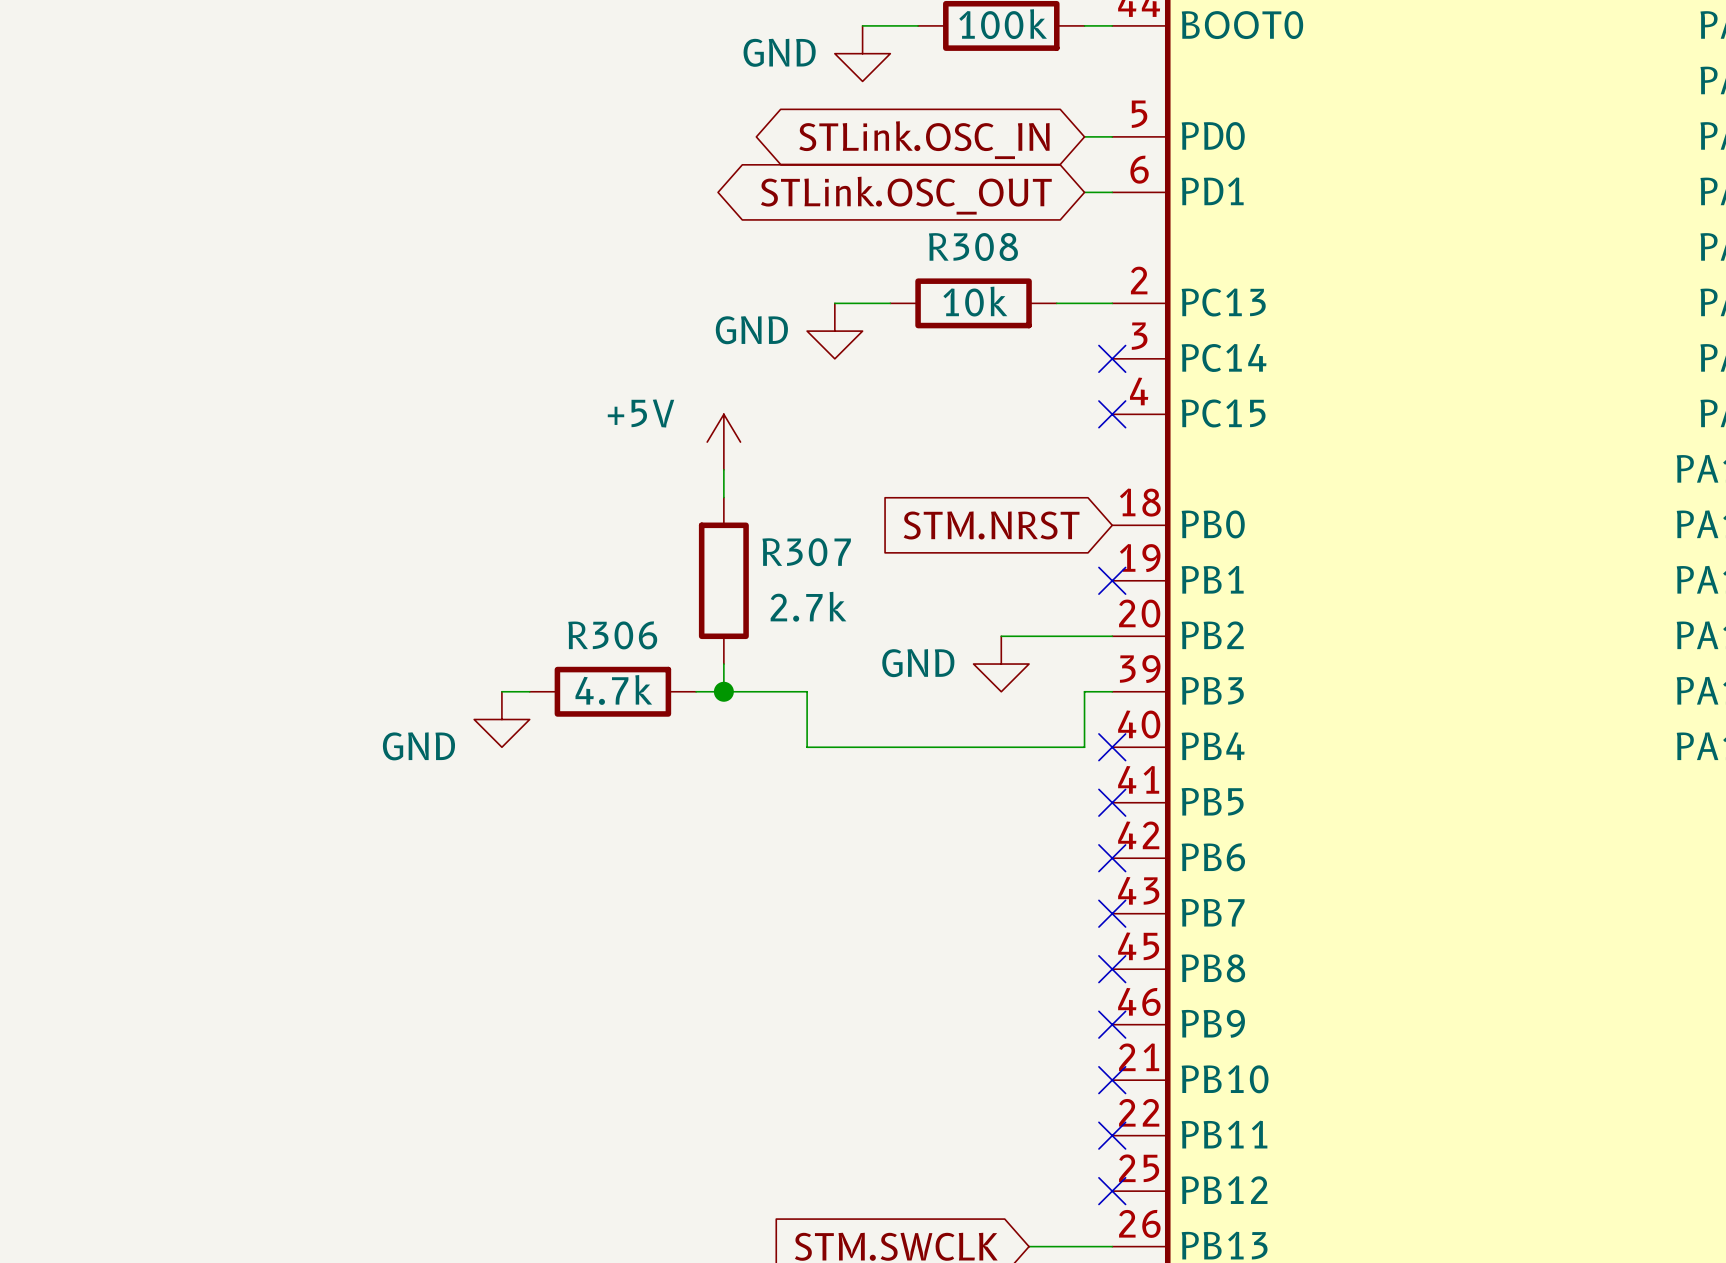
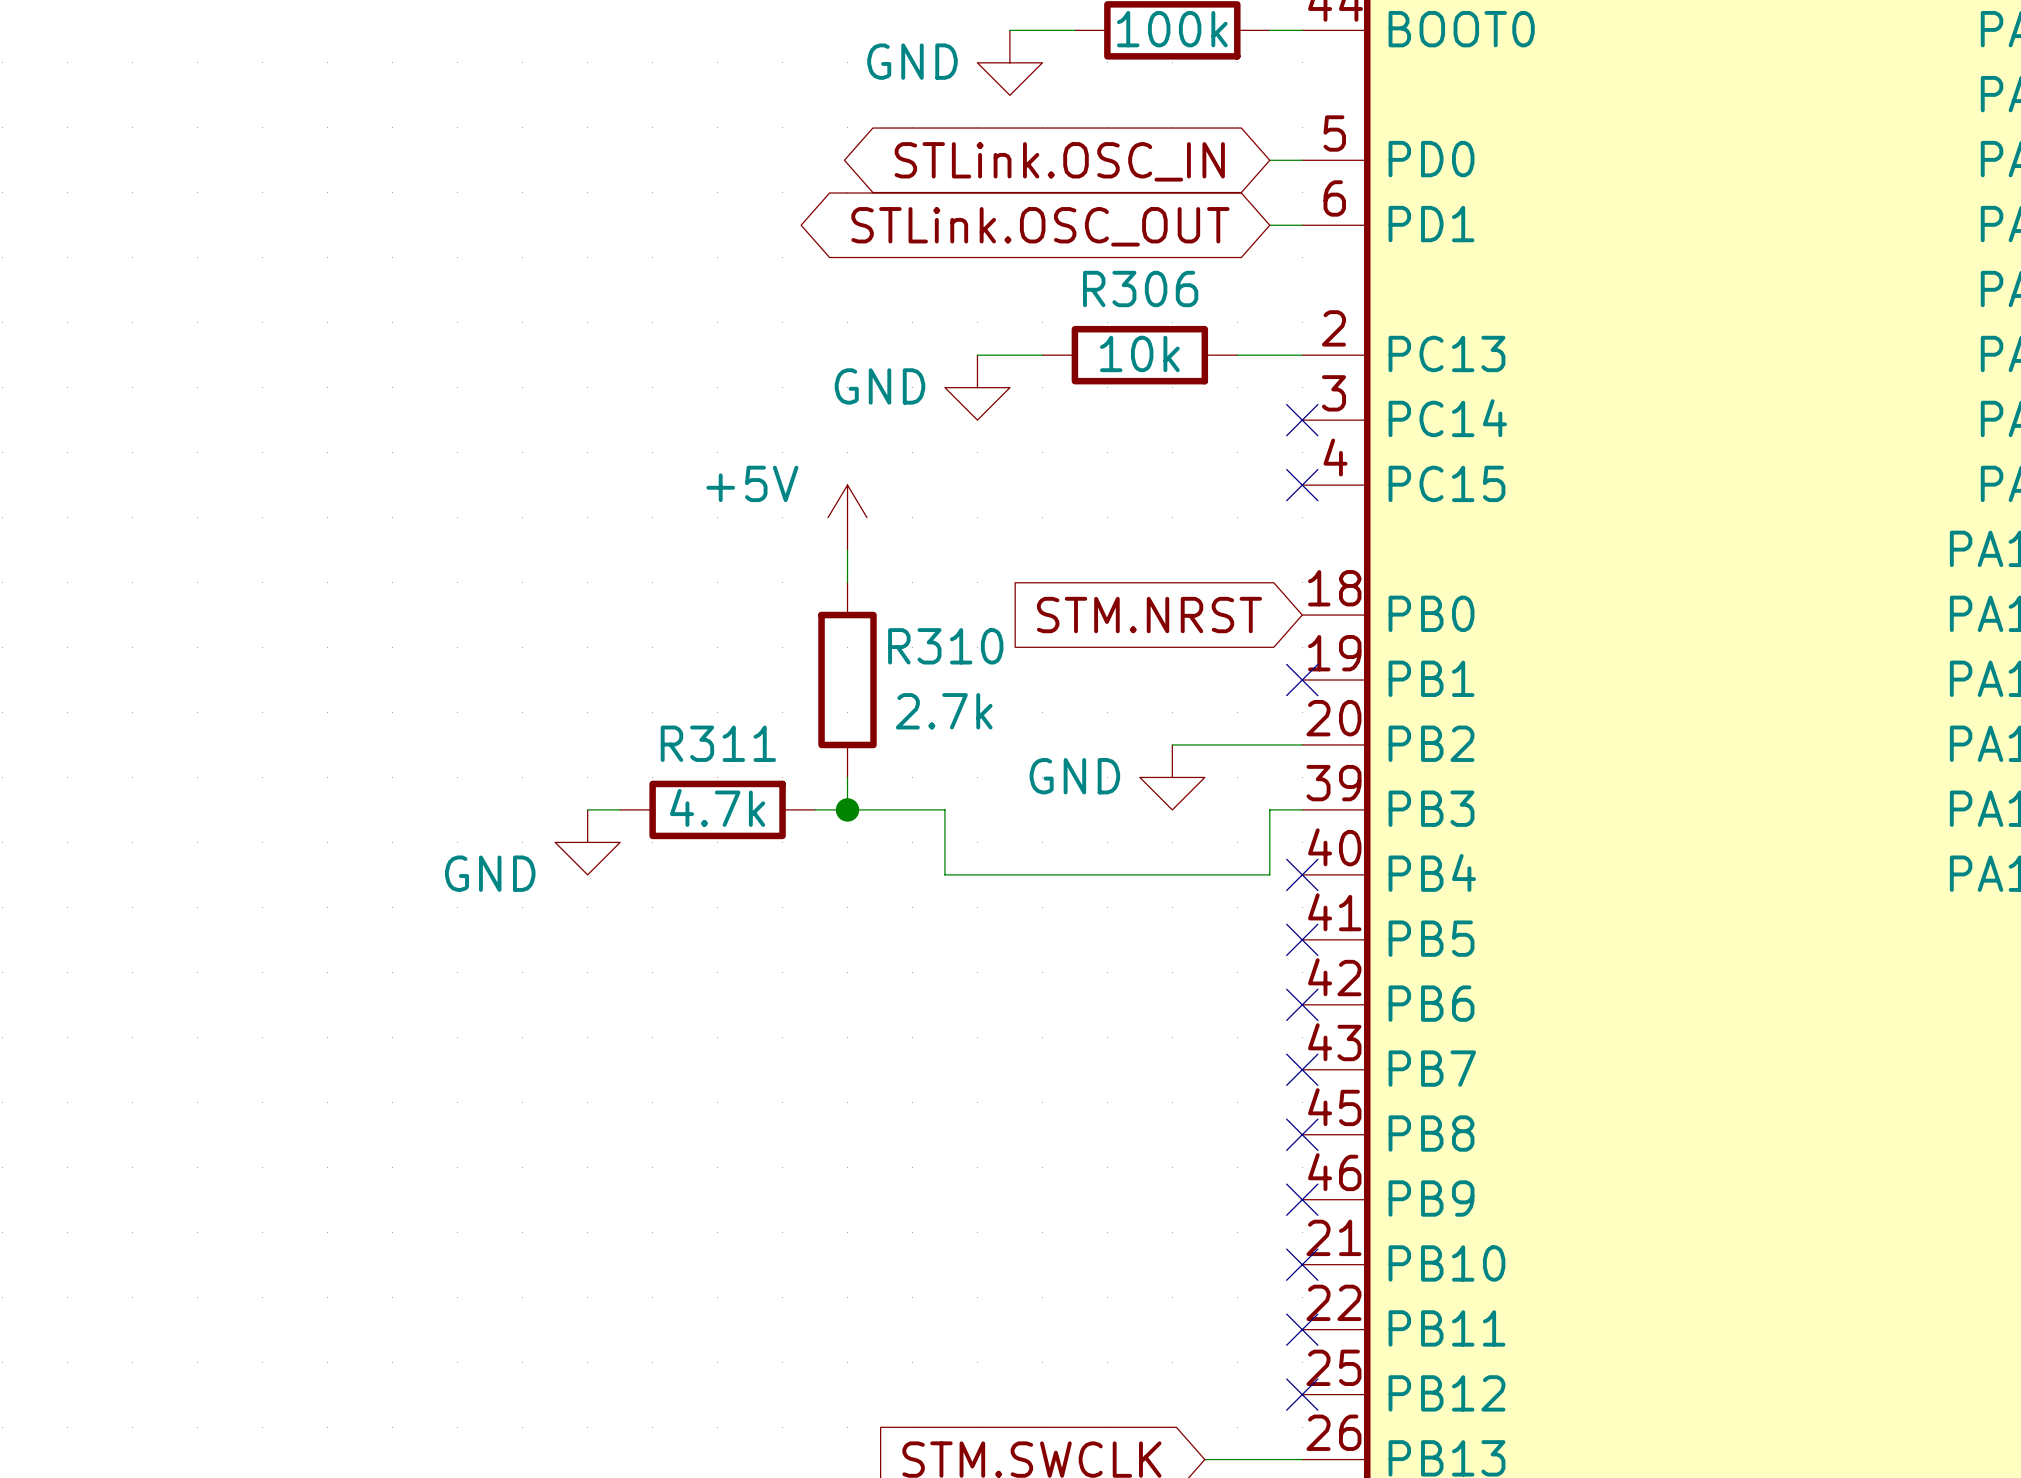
R308 name: R308 (973, 247) -> R306 (1140, 289)
R307 name: R307 (806, 552) -> R310 (945, 646)
R306 name: R306 (612, 635) -> R311 (718, 743)

